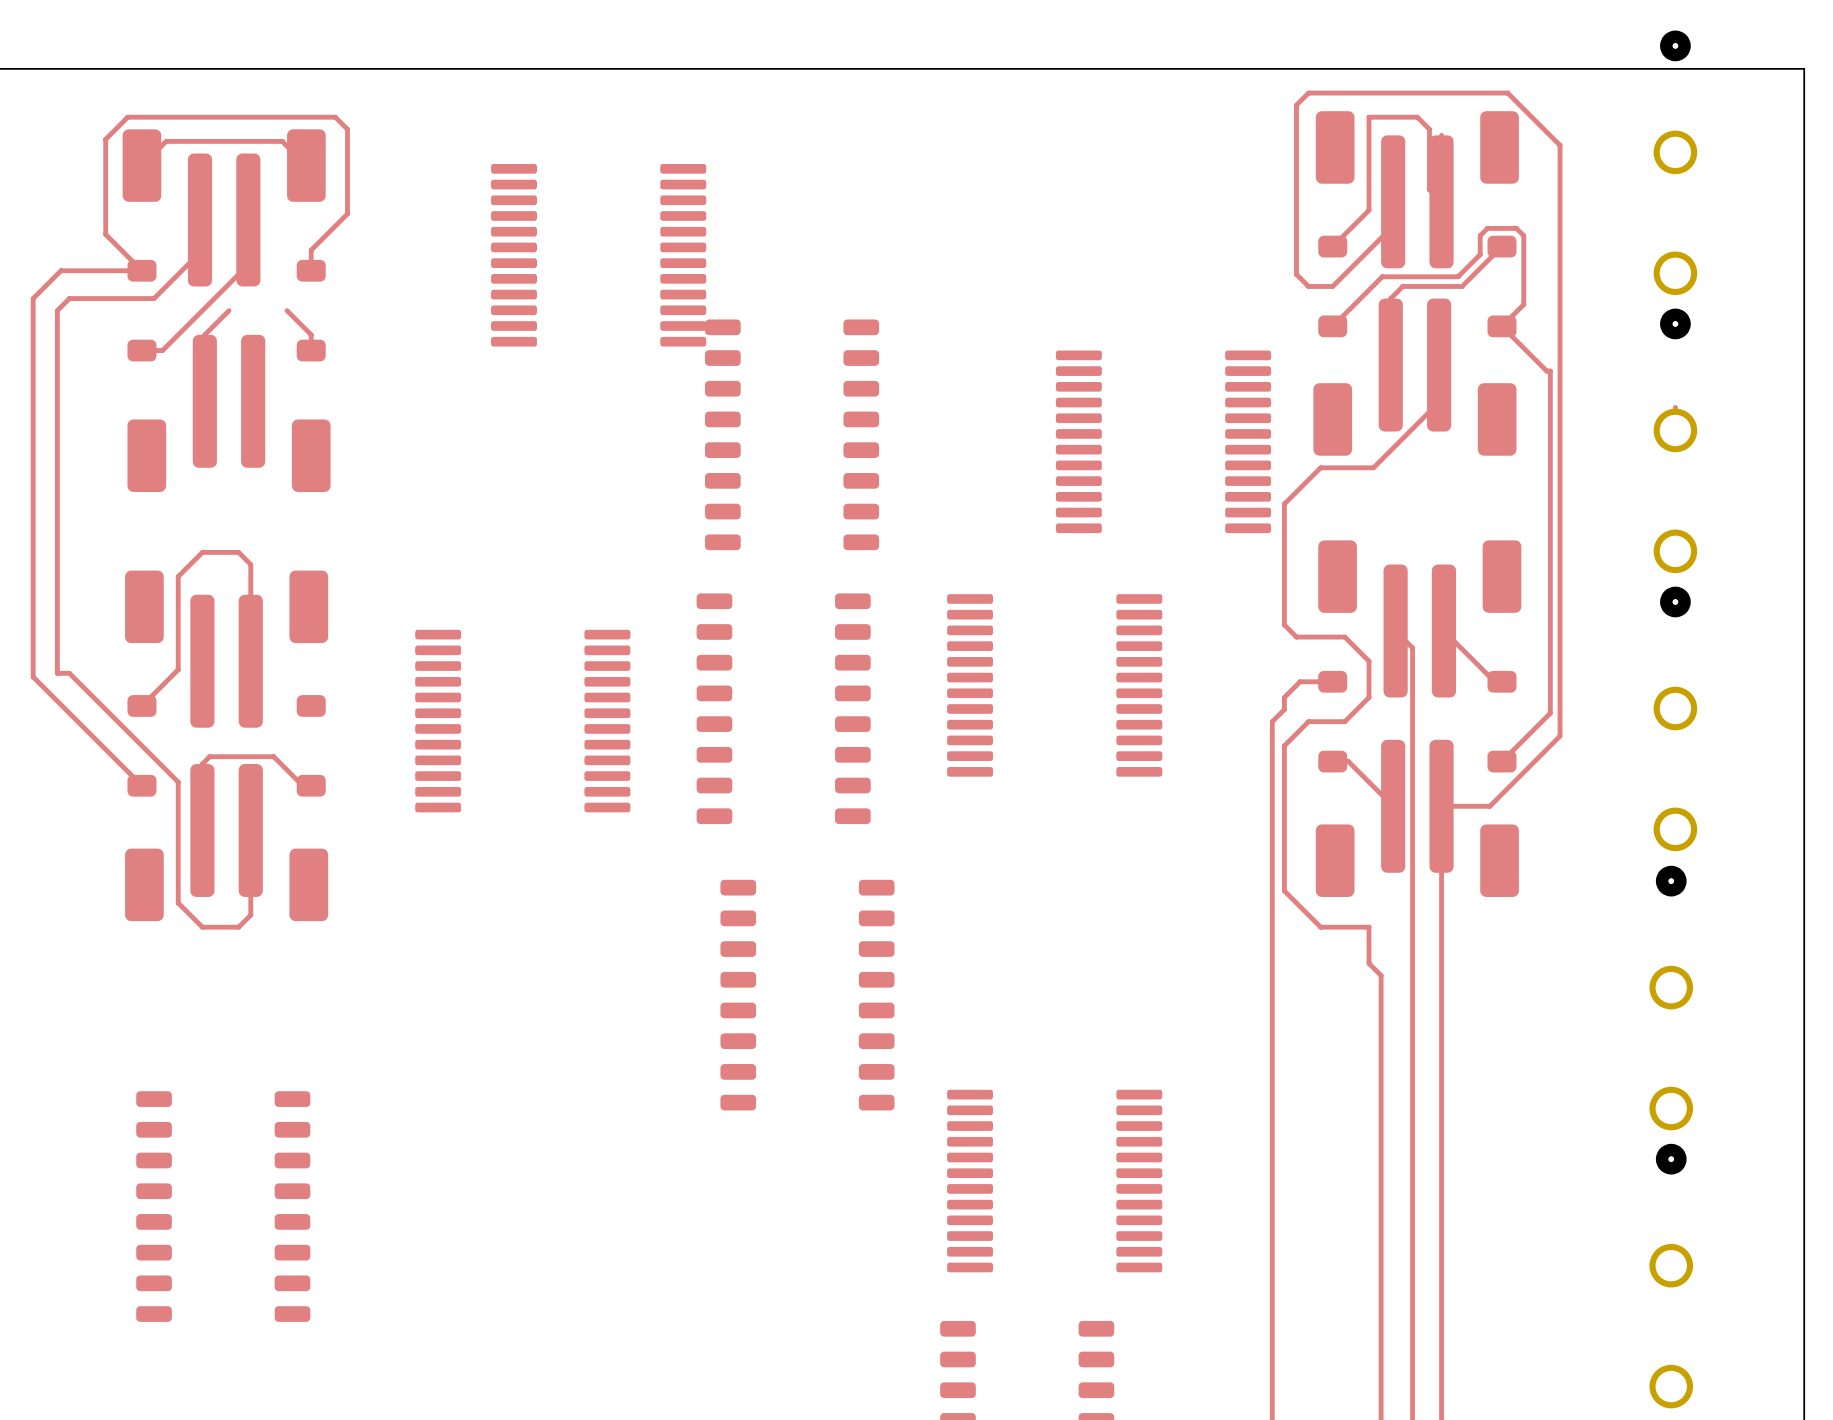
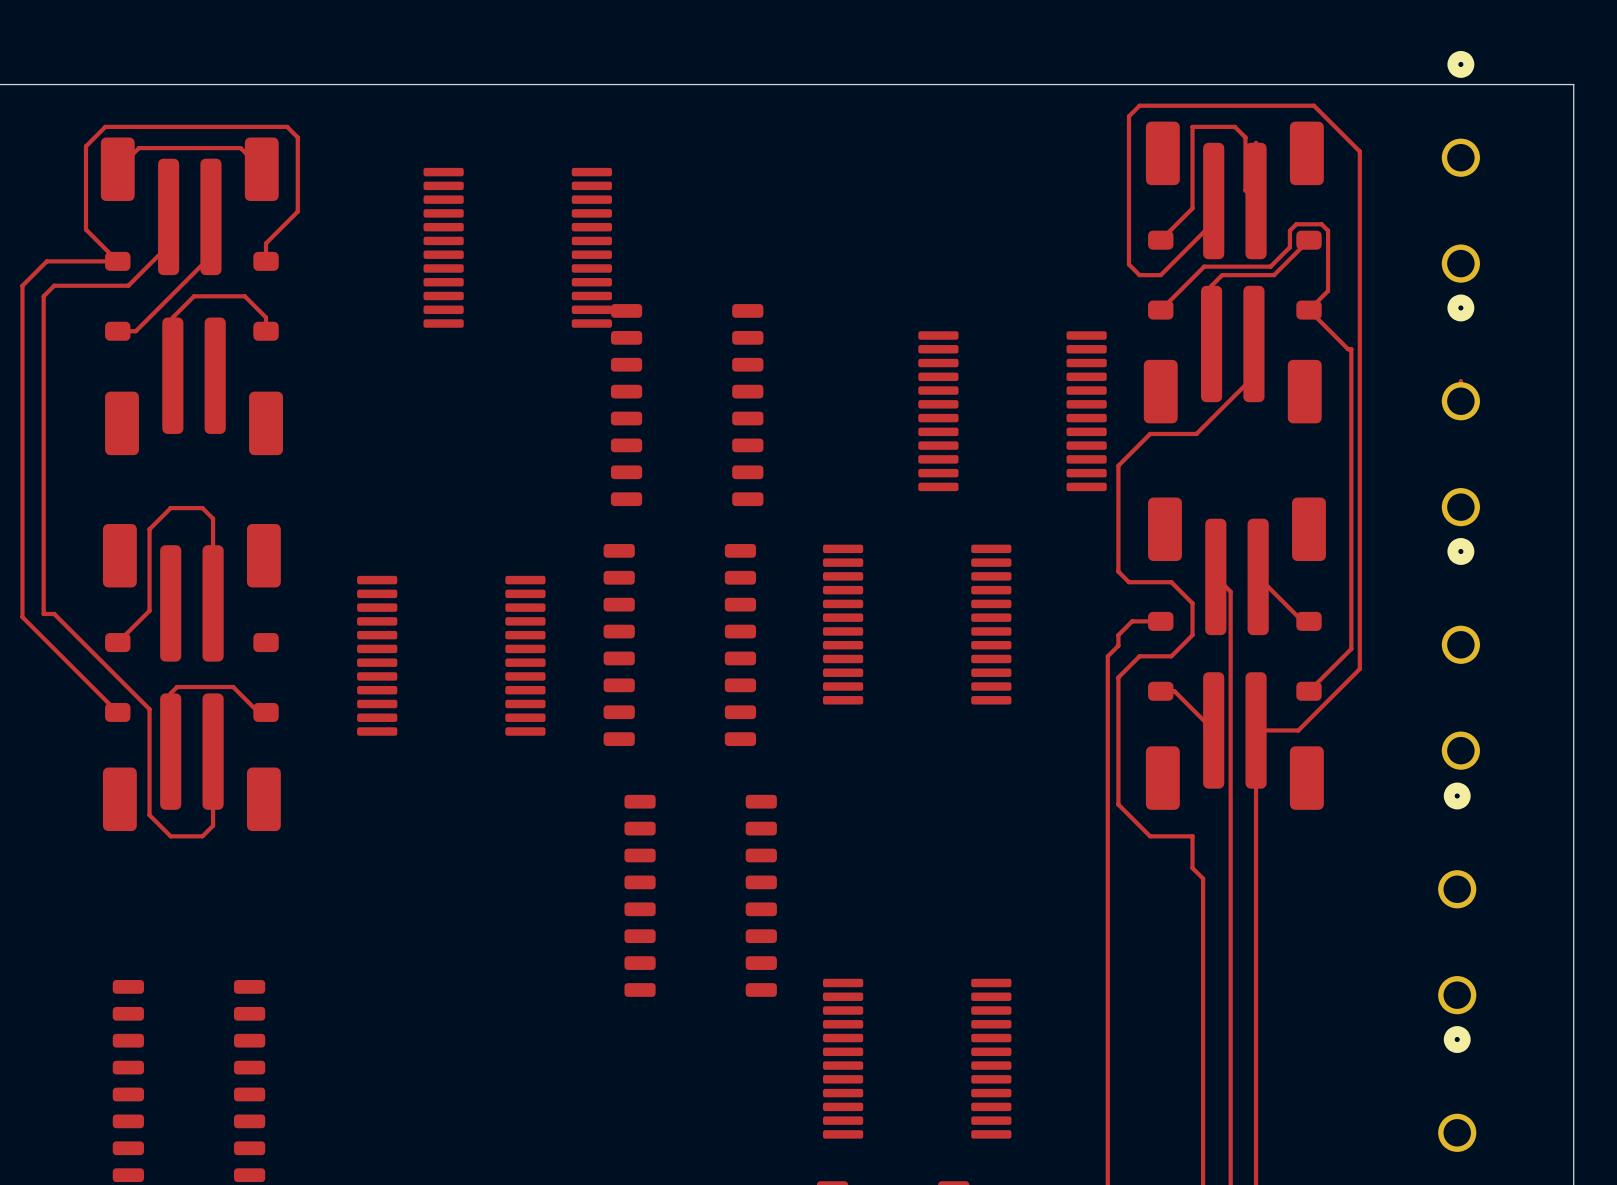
top track: none -> (244, 296) (194, 296)

